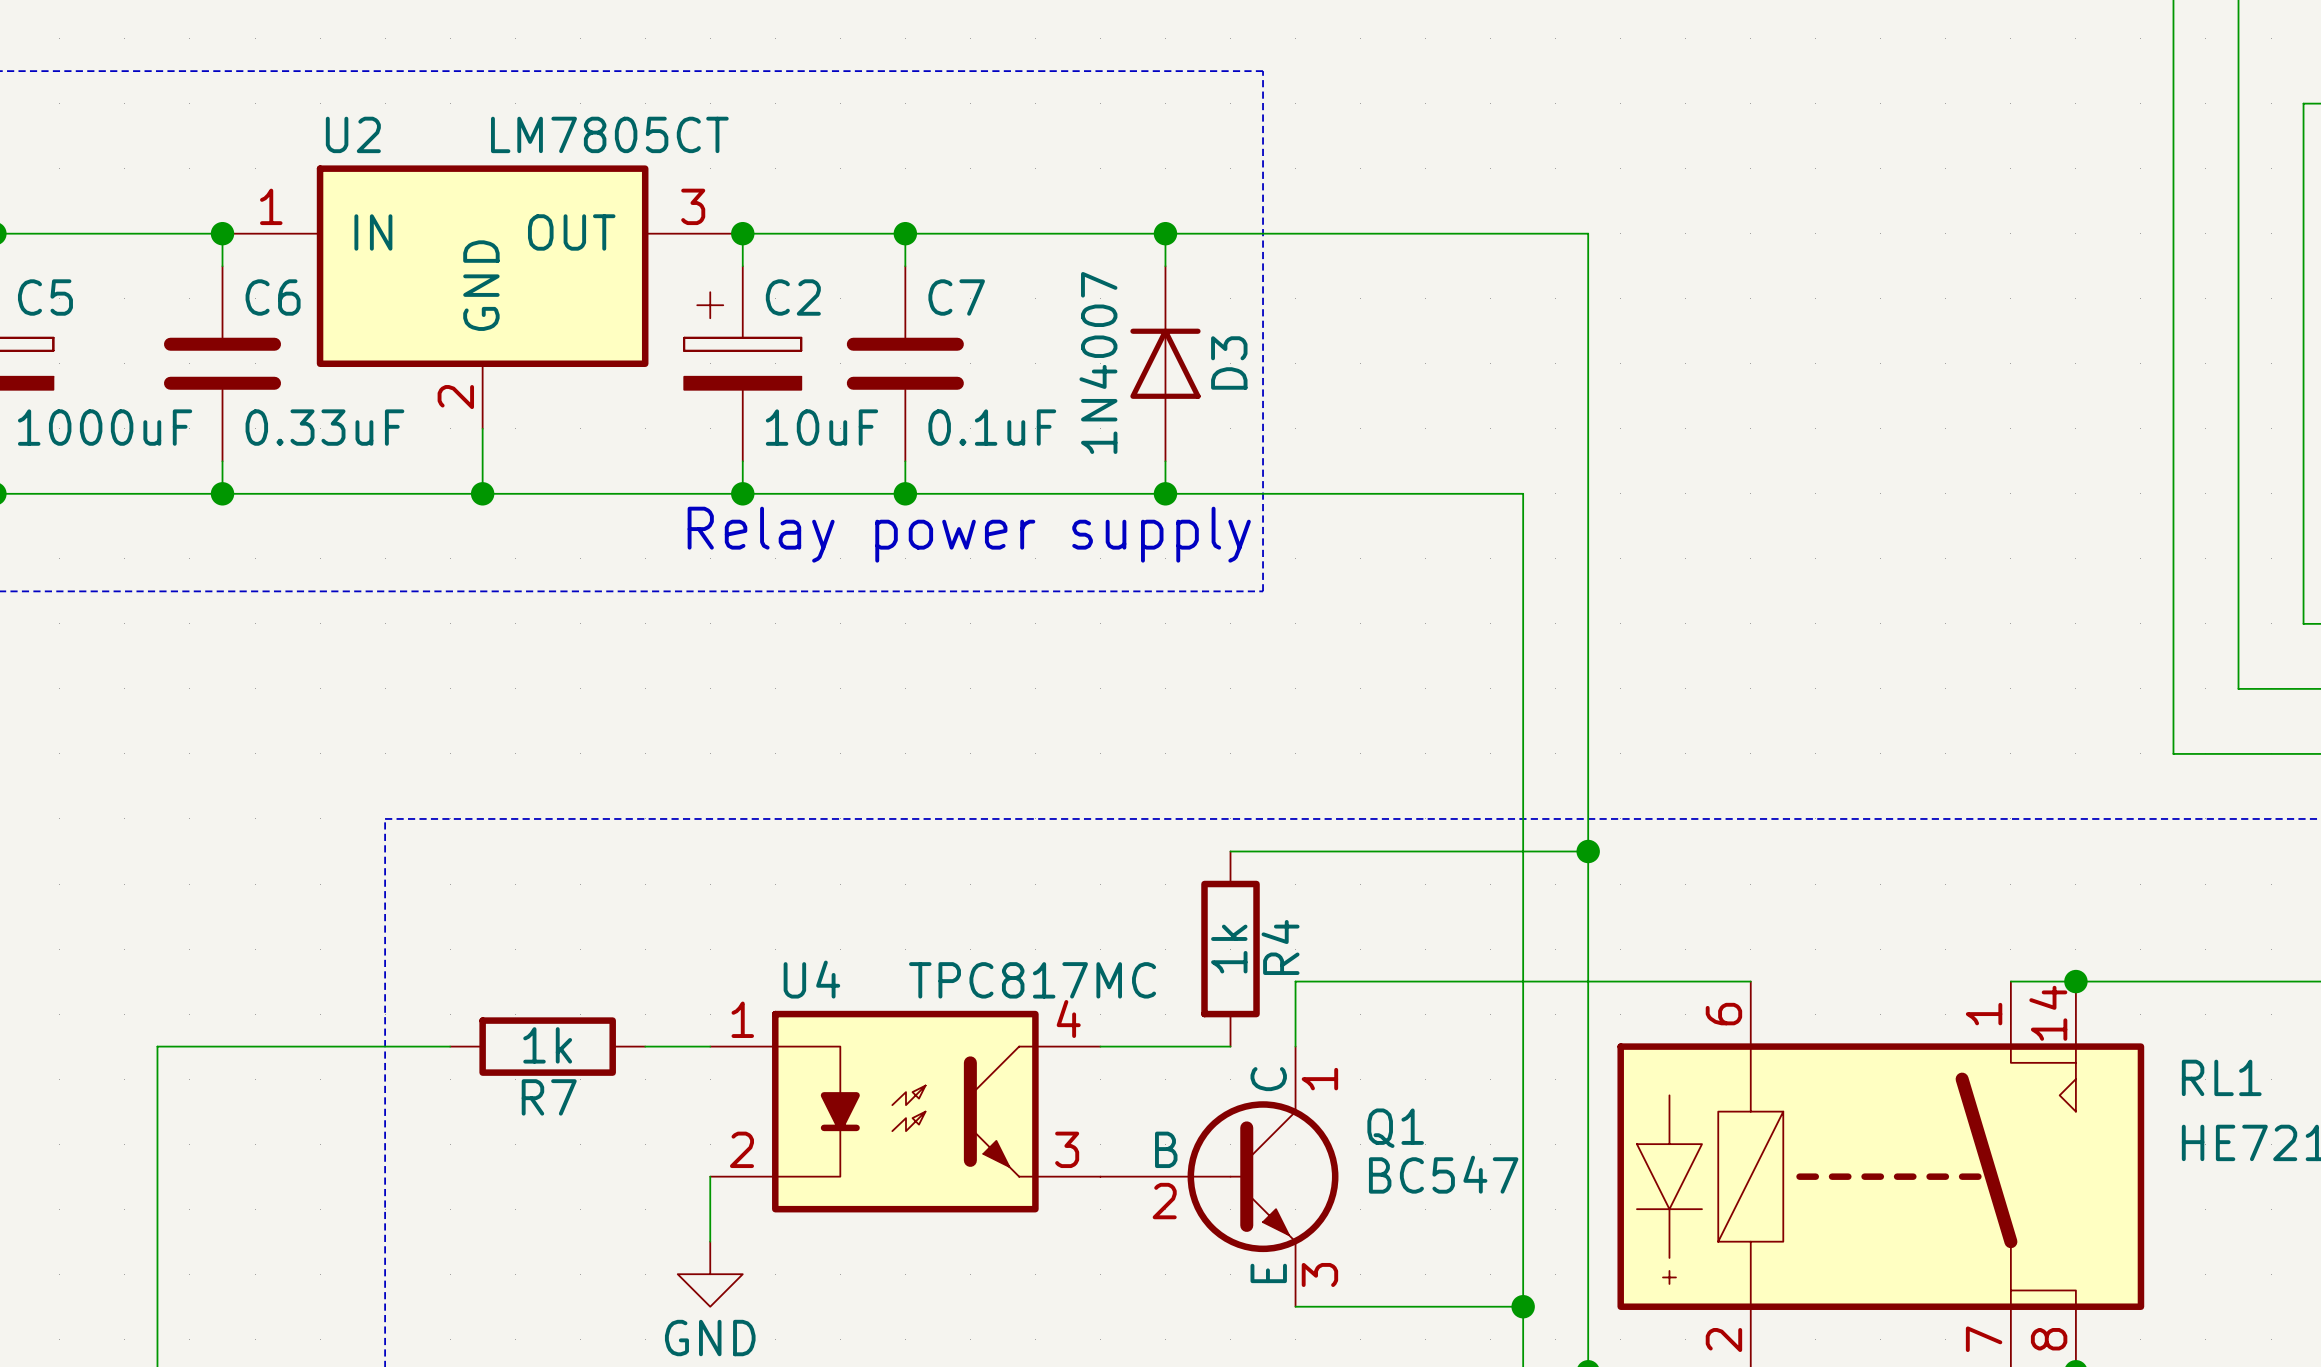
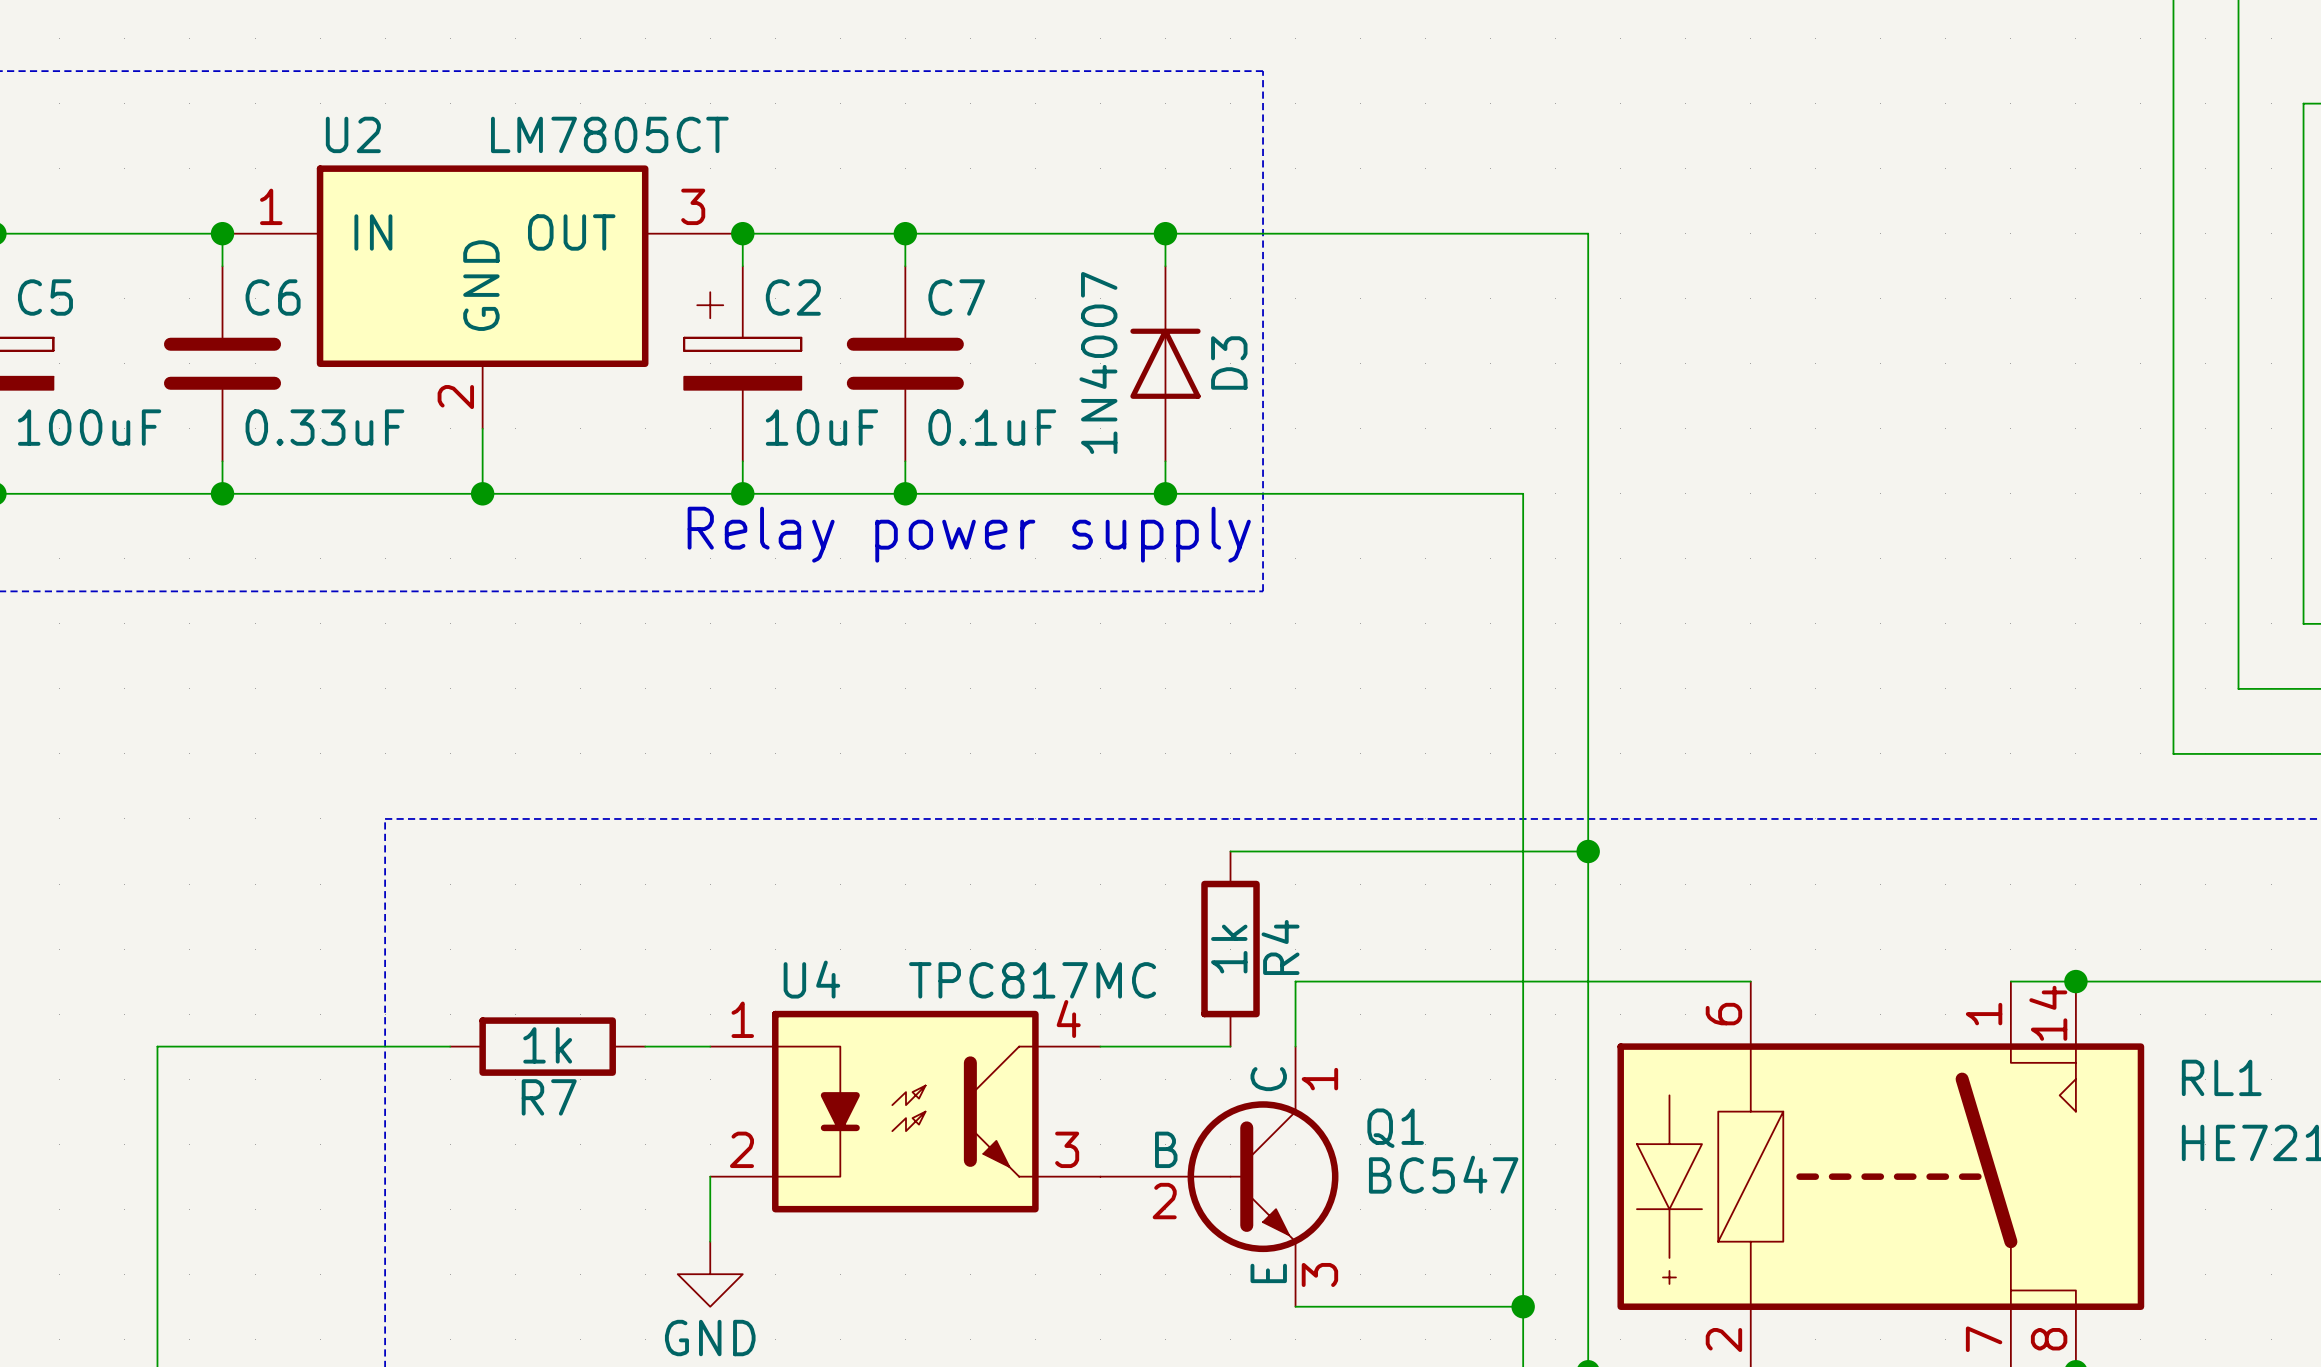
C5 value: 1000uF (105, 427) -> 100uF (89, 427)

